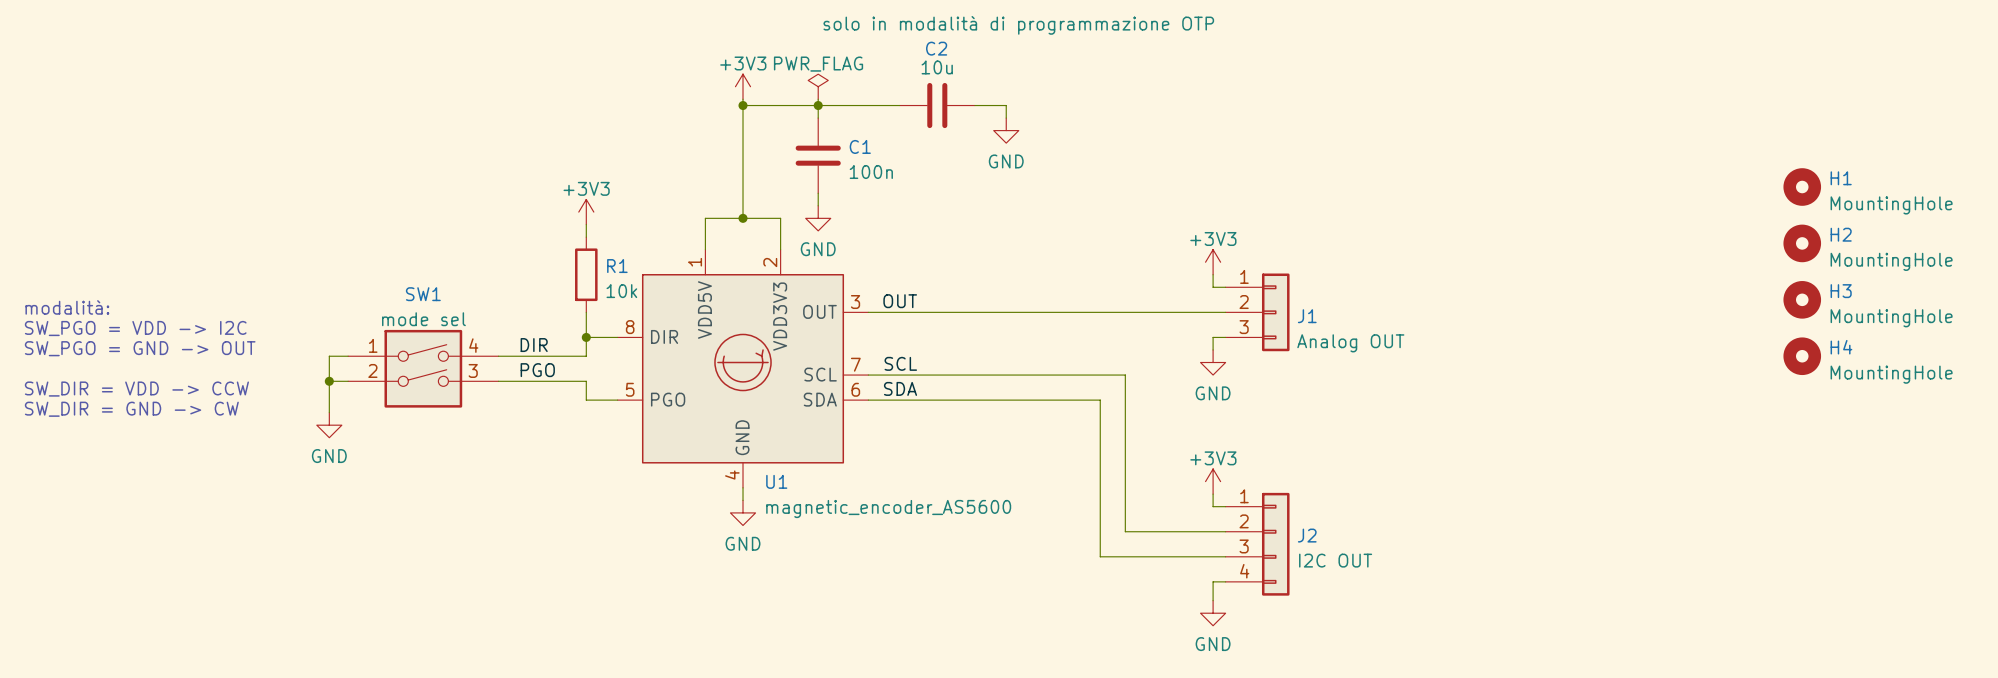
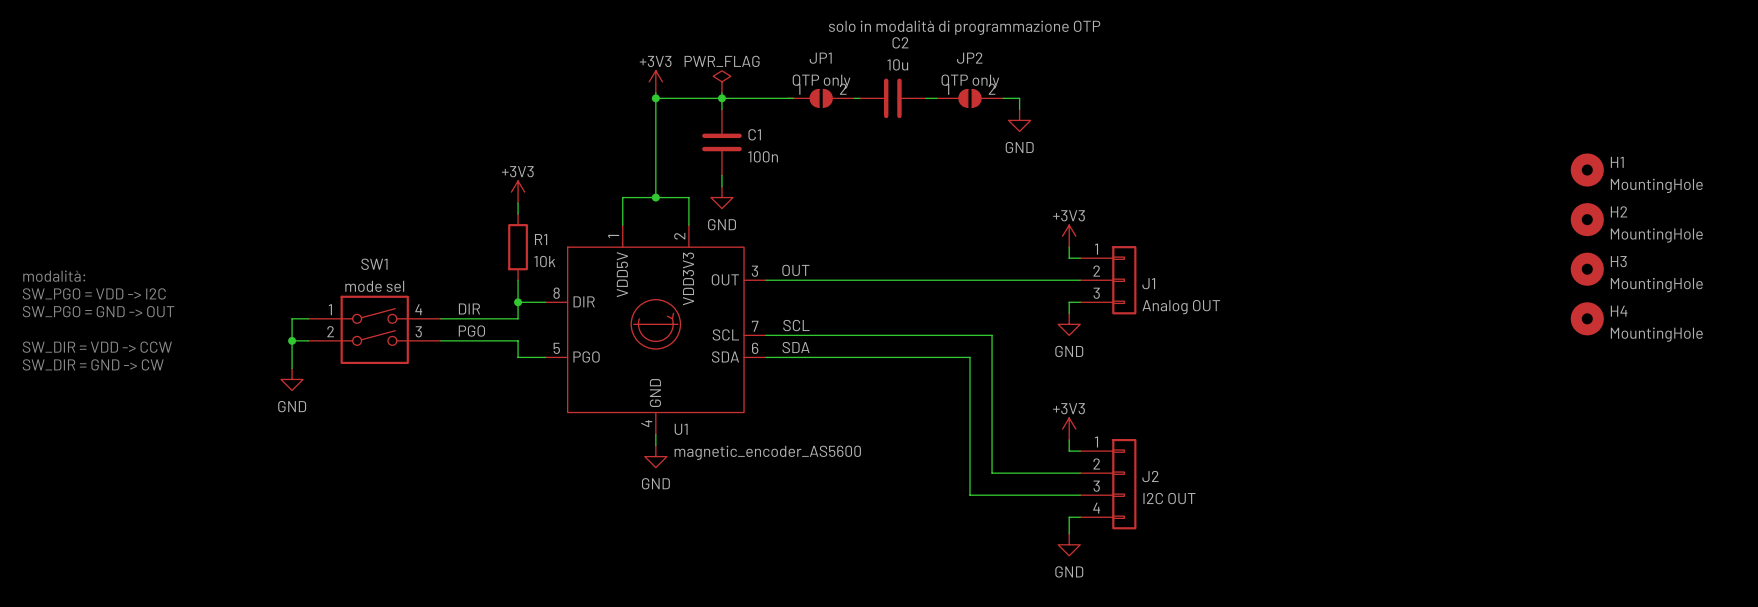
C2 name position: C2 (936, 48) -> C2 (900, 42)
JP1: none -> OTP only (821, 98)
C2 position: (937, 105) -> (892, 98)
wire: none -> (925, 98) (936, 98)
JP2: none -> OTP only (970, 98)
wire: none -> (1003, 98) (1019, 98) (1019, 109)
power symbol position: GND (1006, 130) -> GND (1019, 120)

